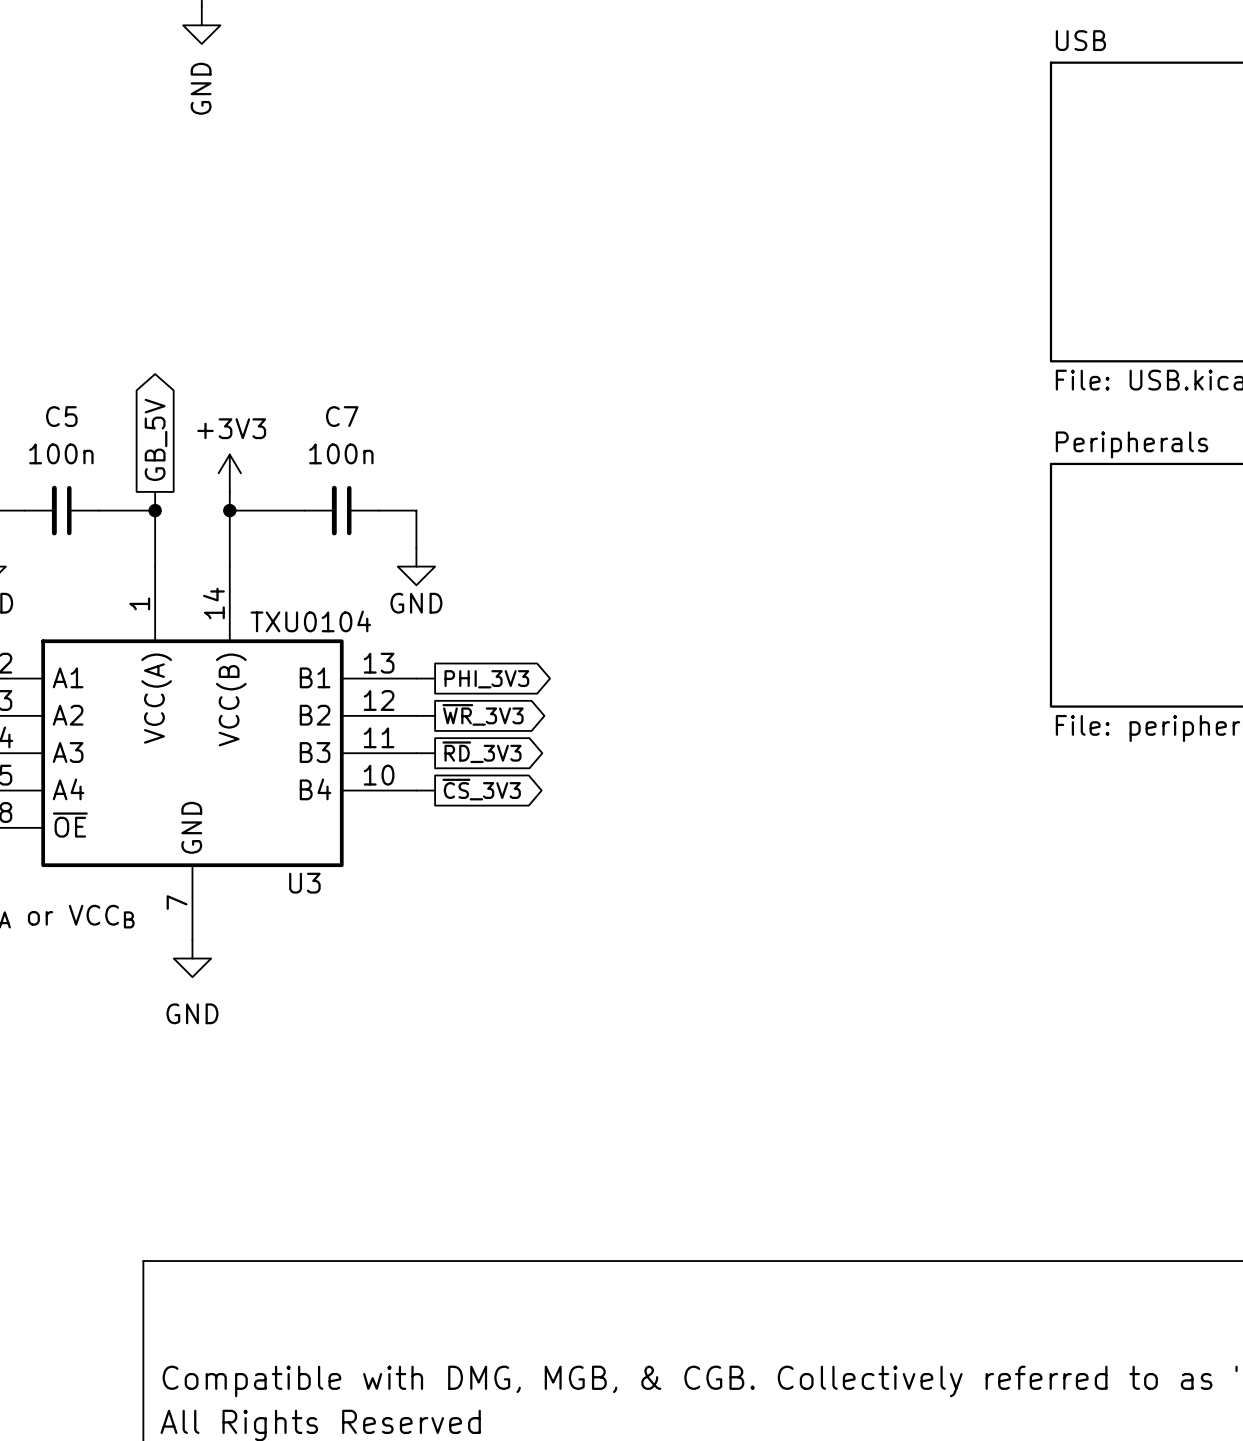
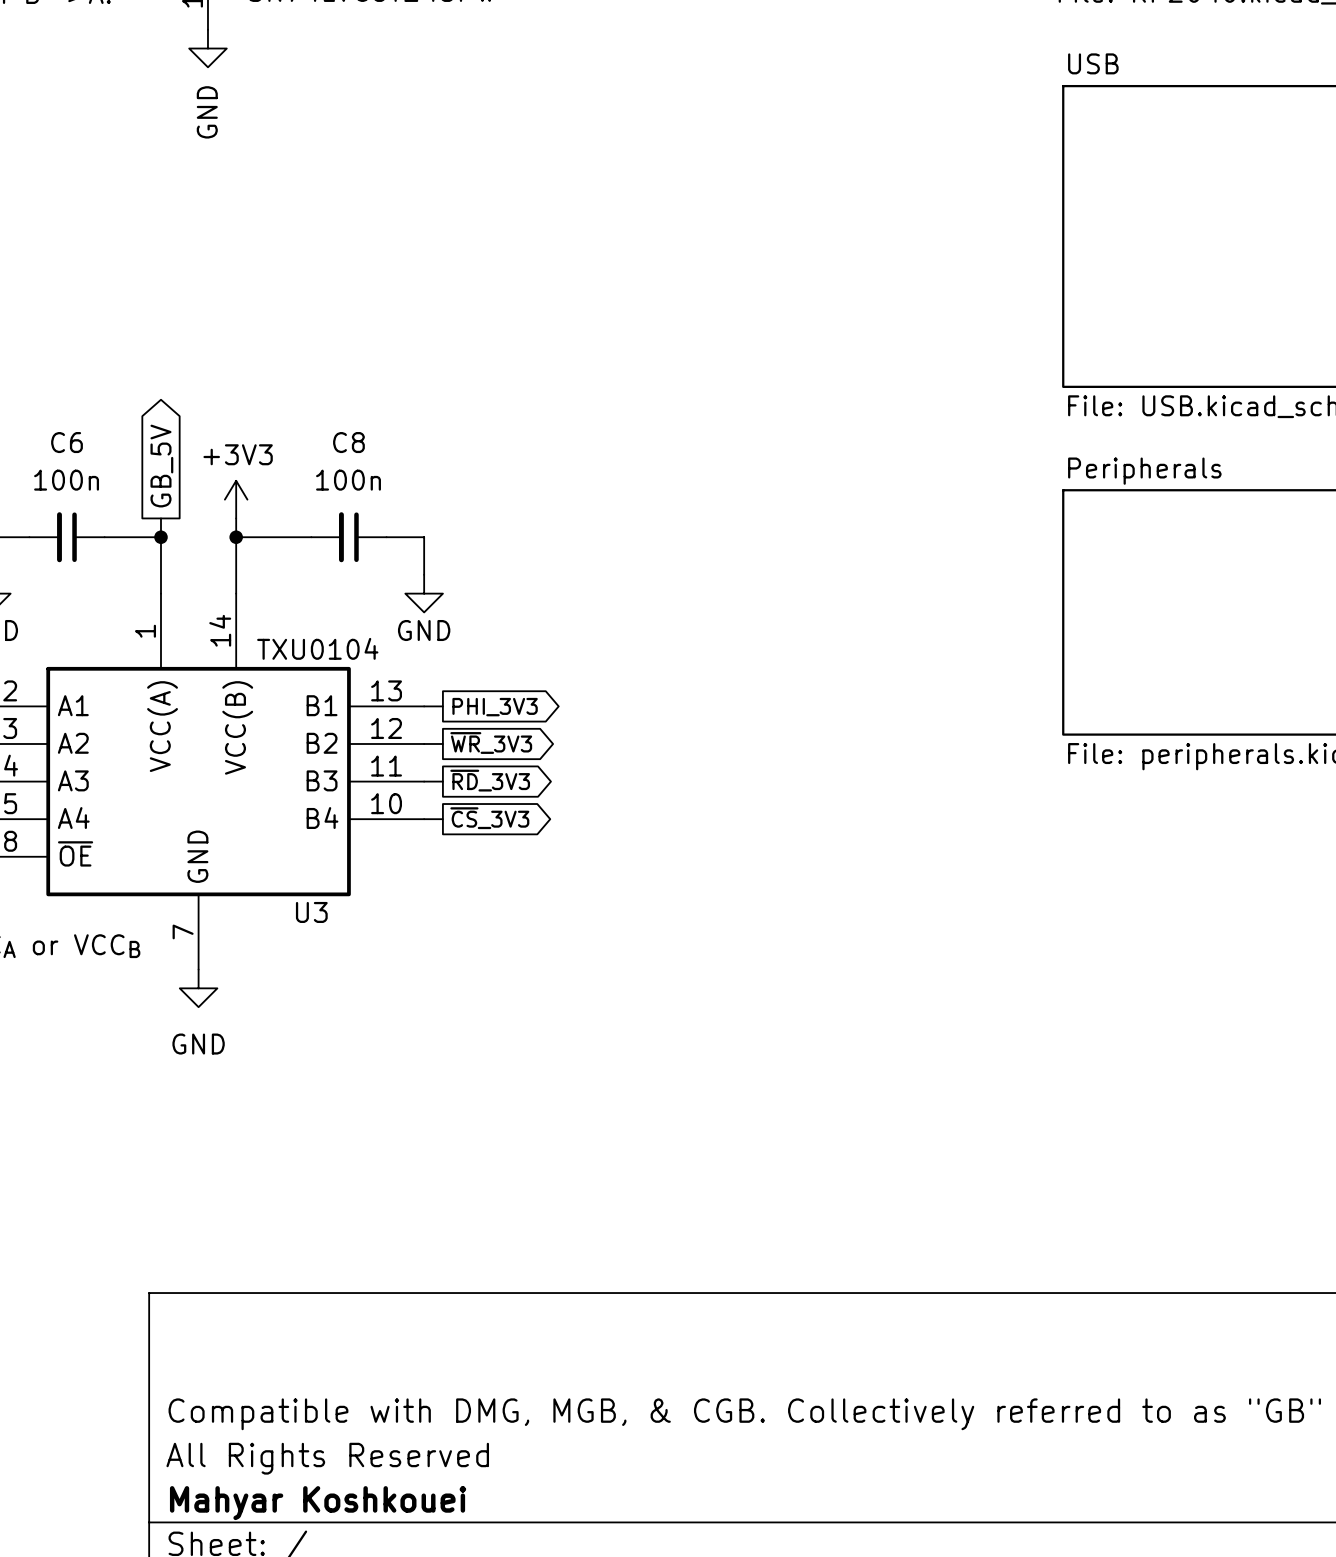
C5 name: C5 (61, 416) -> C6 (67, 442)
C7 name: C7 (342, 416) -> C8 (348, 442)

